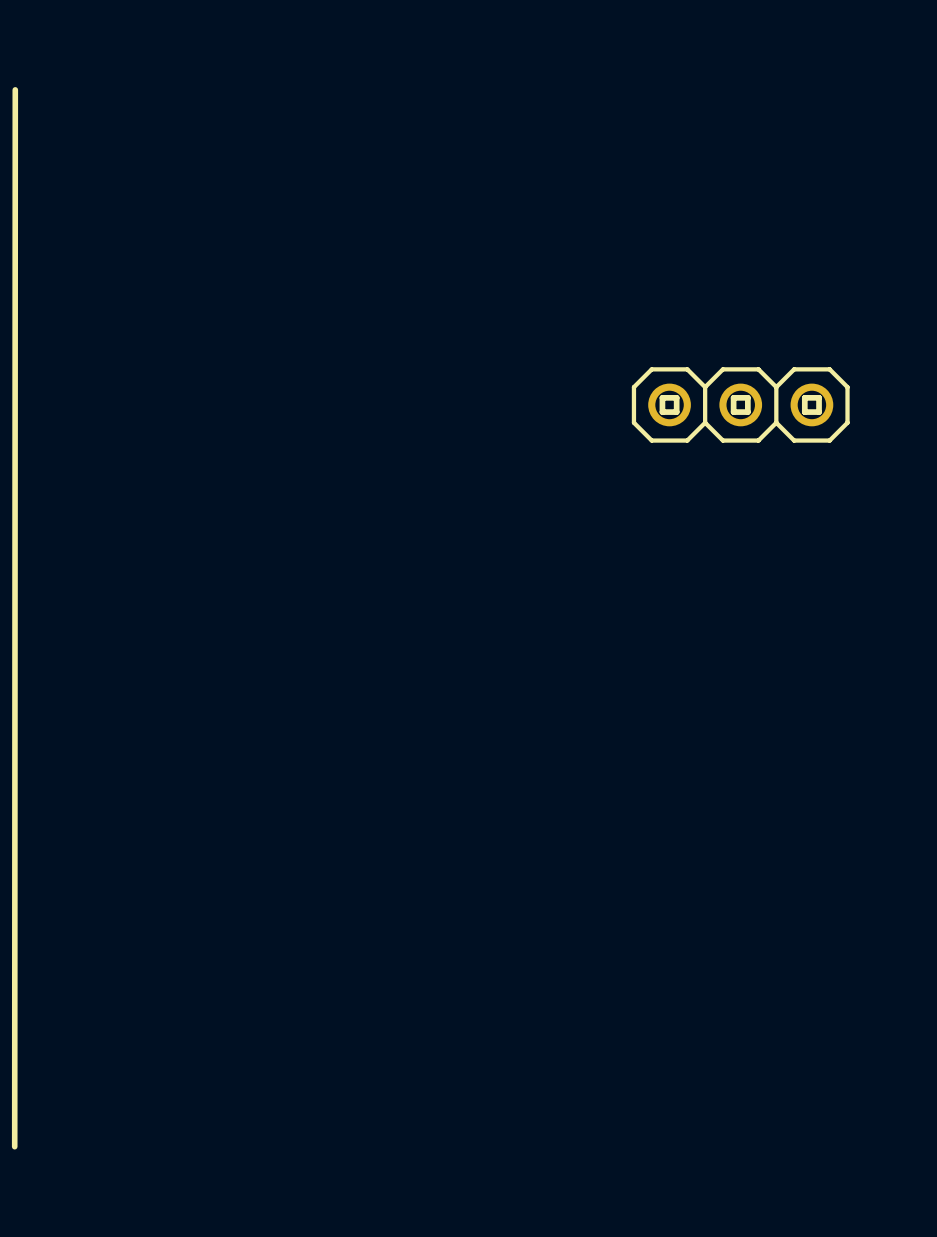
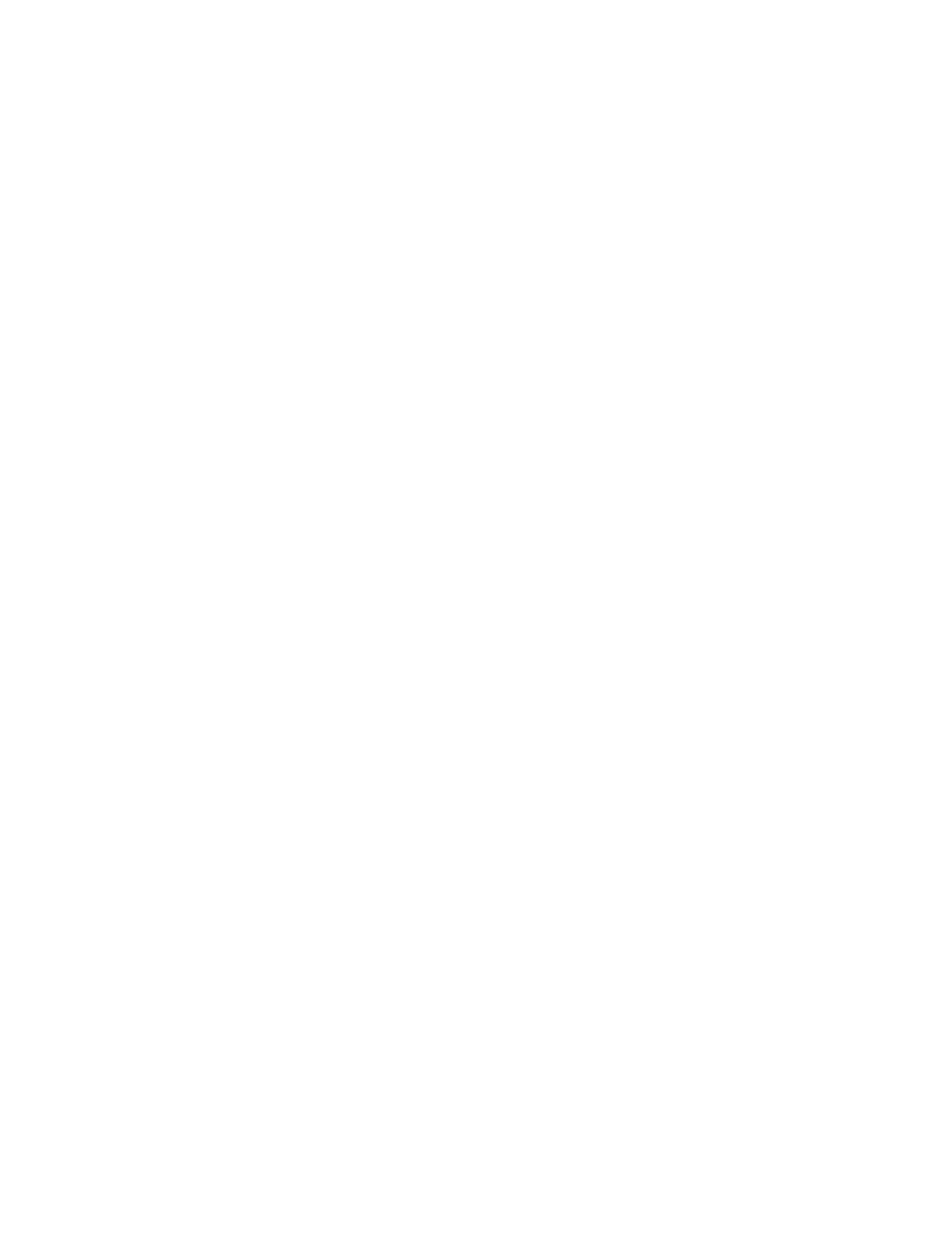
line: (15, 89) (14, 1146) -> none
part: (740, 404) -> none

